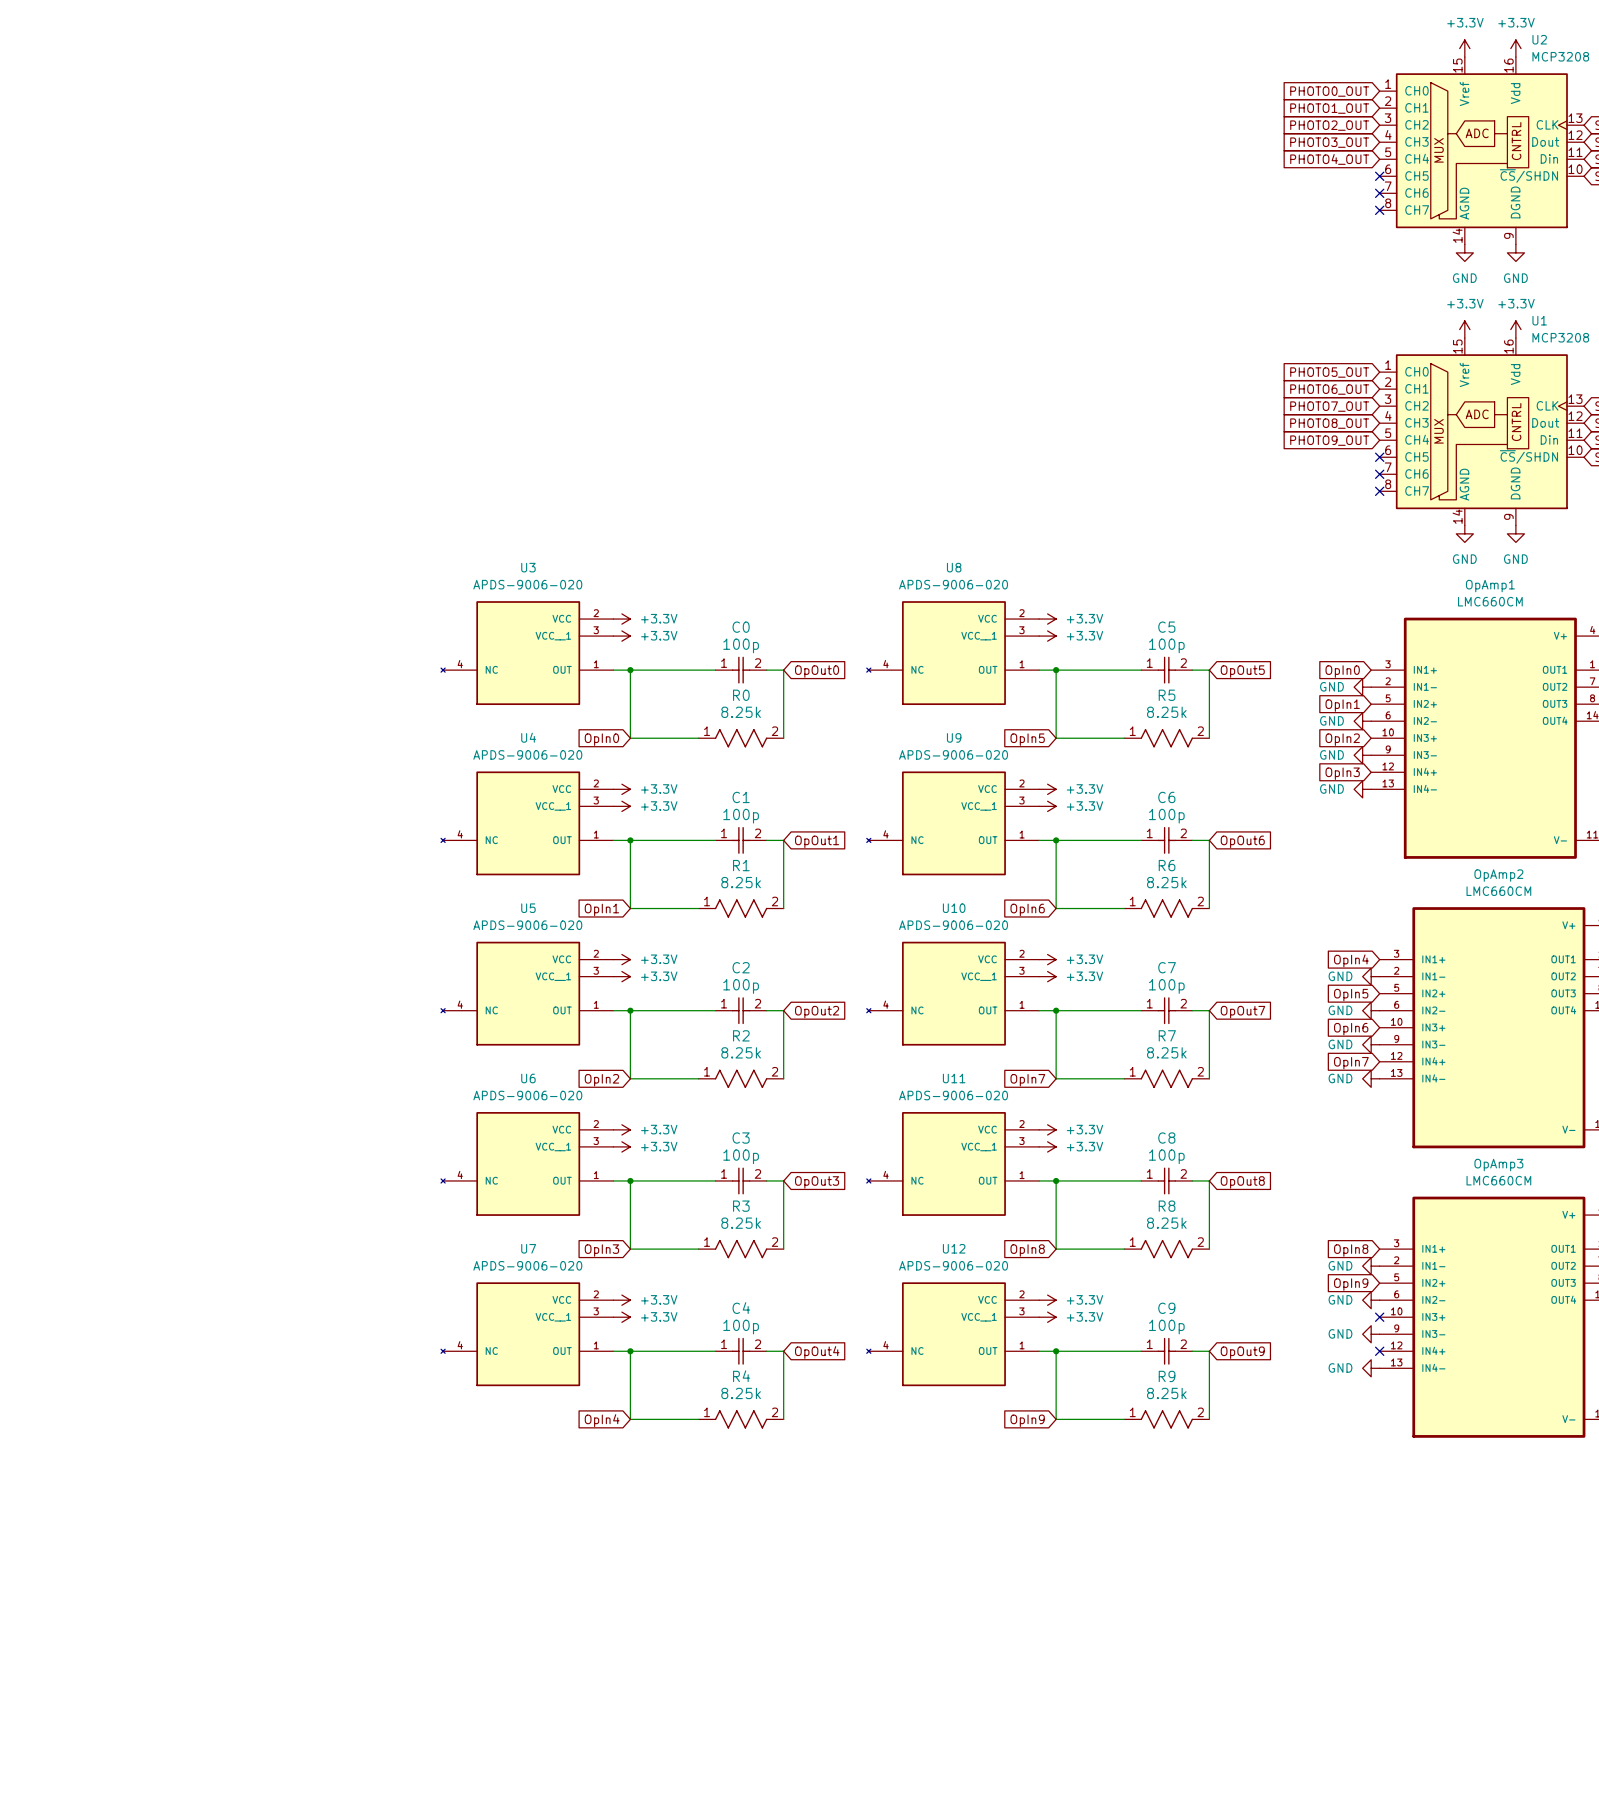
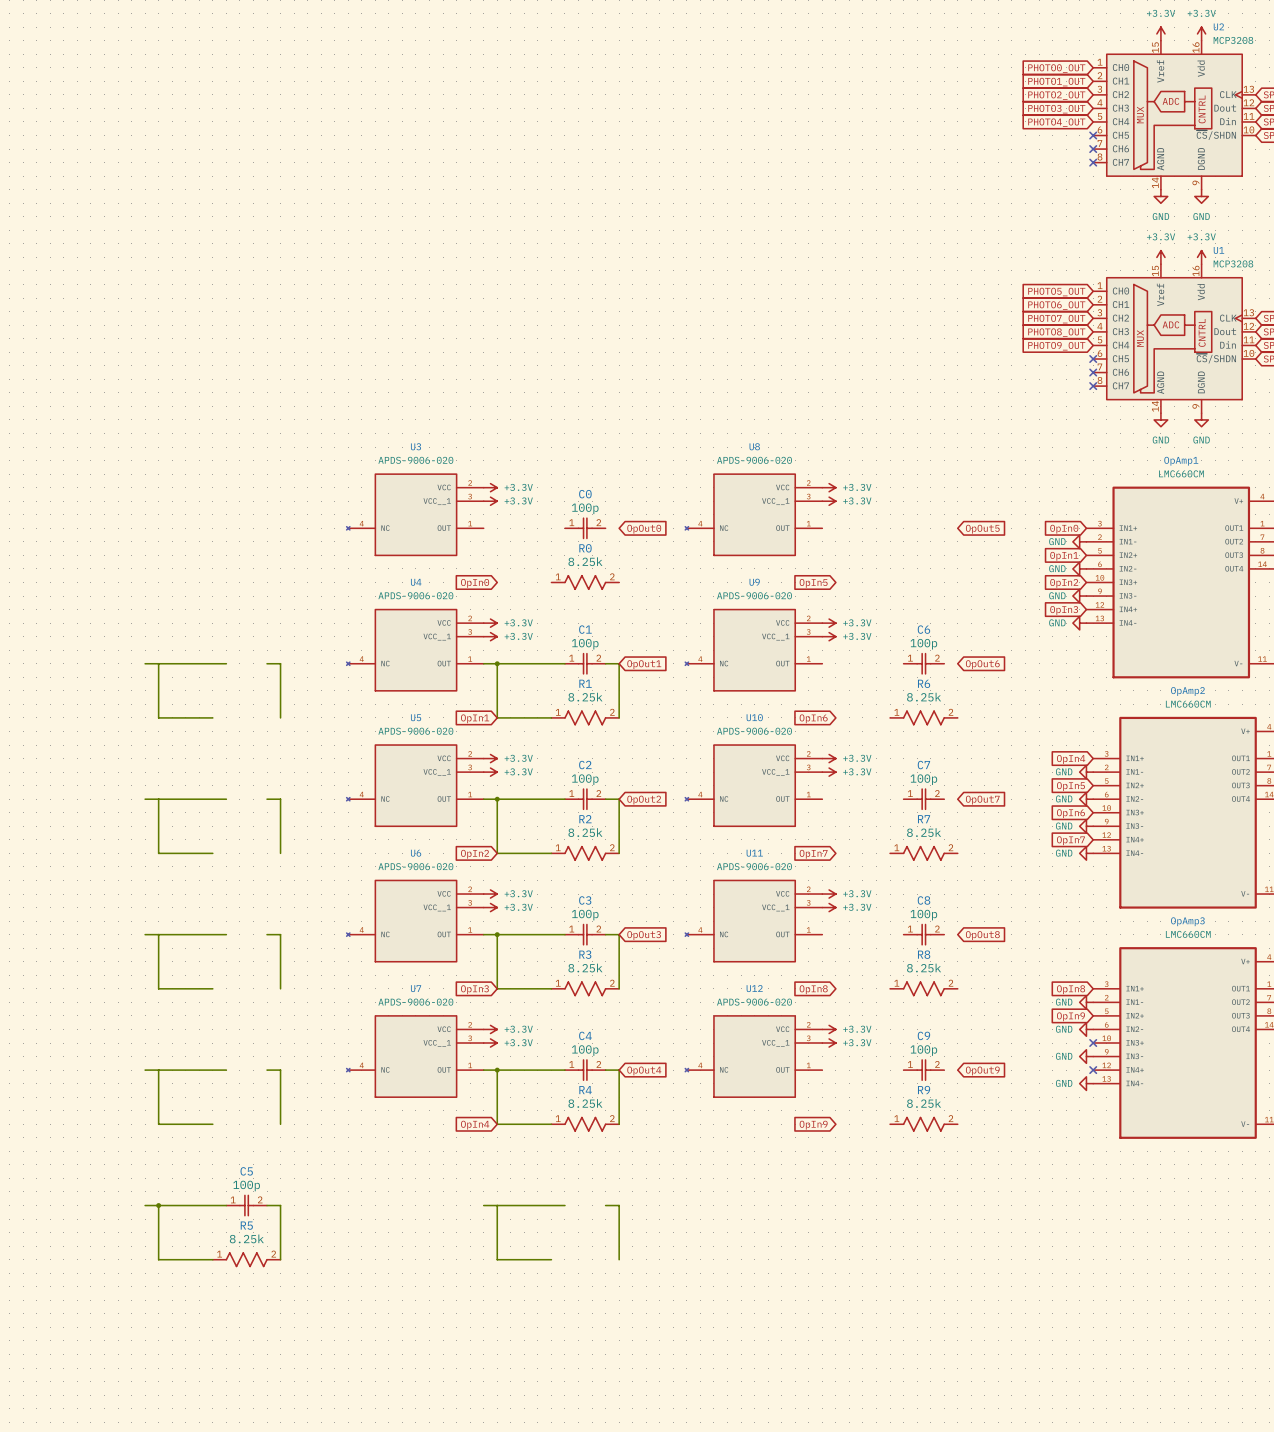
wire: (613, 670) (715, 670) -> none
wire: (630, 670) (630, 738) (698, 738) -> none
junction: (630, 670) -> none
wire: (766, 670) (783, 670) (783, 738) -> none
wire: (1039, 670) (1141, 670) -> none
wire: (1056, 670) (1056, 738) (1124, 738) -> none
junction: (1056, 670) -> none
C5 position: (1166, 670) -> (246, 1205)
wire: (1192, 670) (1209, 670) (1209, 738) -> none
R5 position: (1166, 738) -> (246, 1259)
wire: none -> (145, 663) (226, 663)
wire: none -> (158, 663) (158, 717) (212, 717)
wire: none -> (267, 663) (280, 663) (280, 717)
wire: (1039, 840) (1141, 840) -> none
wire: (1056, 840) (1056, 908) (1124, 908) -> none
junction: (1056, 840) -> none
wire: (1192, 840) (1209, 840) (1209, 908) -> none
wire: none -> (145, 799) (226, 799)
wire: none -> (158, 799) (158, 853) (212, 853)
wire: none -> (267, 799) (280, 799) (280, 853)
wire: (1039, 1010) (1141, 1010) -> none
wire: (1056, 1010) (1056, 1078) (1124, 1078) -> none
junction: (1056, 1010) -> none
wire: (1192, 1010) (1209, 1010) (1209, 1078) -> none
wire: none -> (145, 934) (226, 934)
wire: none -> (158, 934) (158, 988) (212, 988)
wire: none -> (267, 934) (280, 934) (280, 988)
wire: (1039, 1180) (1141, 1180) -> none
wire: (1056, 1180) (1056, 1249) (1124, 1249) -> none
junction: (1056, 1180) -> none
wire: (1192, 1180) (1209, 1180) (1209, 1249) -> none
wire: none -> (145, 1070) (226, 1070)
wire: none -> (158, 1070) (158, 1124) (212, 1124)
wire: none -> (267, 1070) (280, 1070) (280, 1124)
wire: (1039, 1351) (1141, 1351) -> none
wire: (1056, 1351) (1056, 1419) (1124, 1419) -> none
junction: (1056, 1351) -> none
wire: (1192, 1351) (1209, 1351) (1209, 1419) -> none
wire: none -> (145, 1205) (226, 1205)
wire: none -> (158, 1205) (158, 1259) (212, 1259)
junction: none -> (158, 1205)
wire: none -> (267, 1205) (280, 1205) (280, 1259)
wire: none -> (483, 1205) (564, 1205)
wire: none -> (497, 1205) (497, 1259) (551, 1259)
wire: none -> (605, 1205) (619, 1205) (619, 1259)

